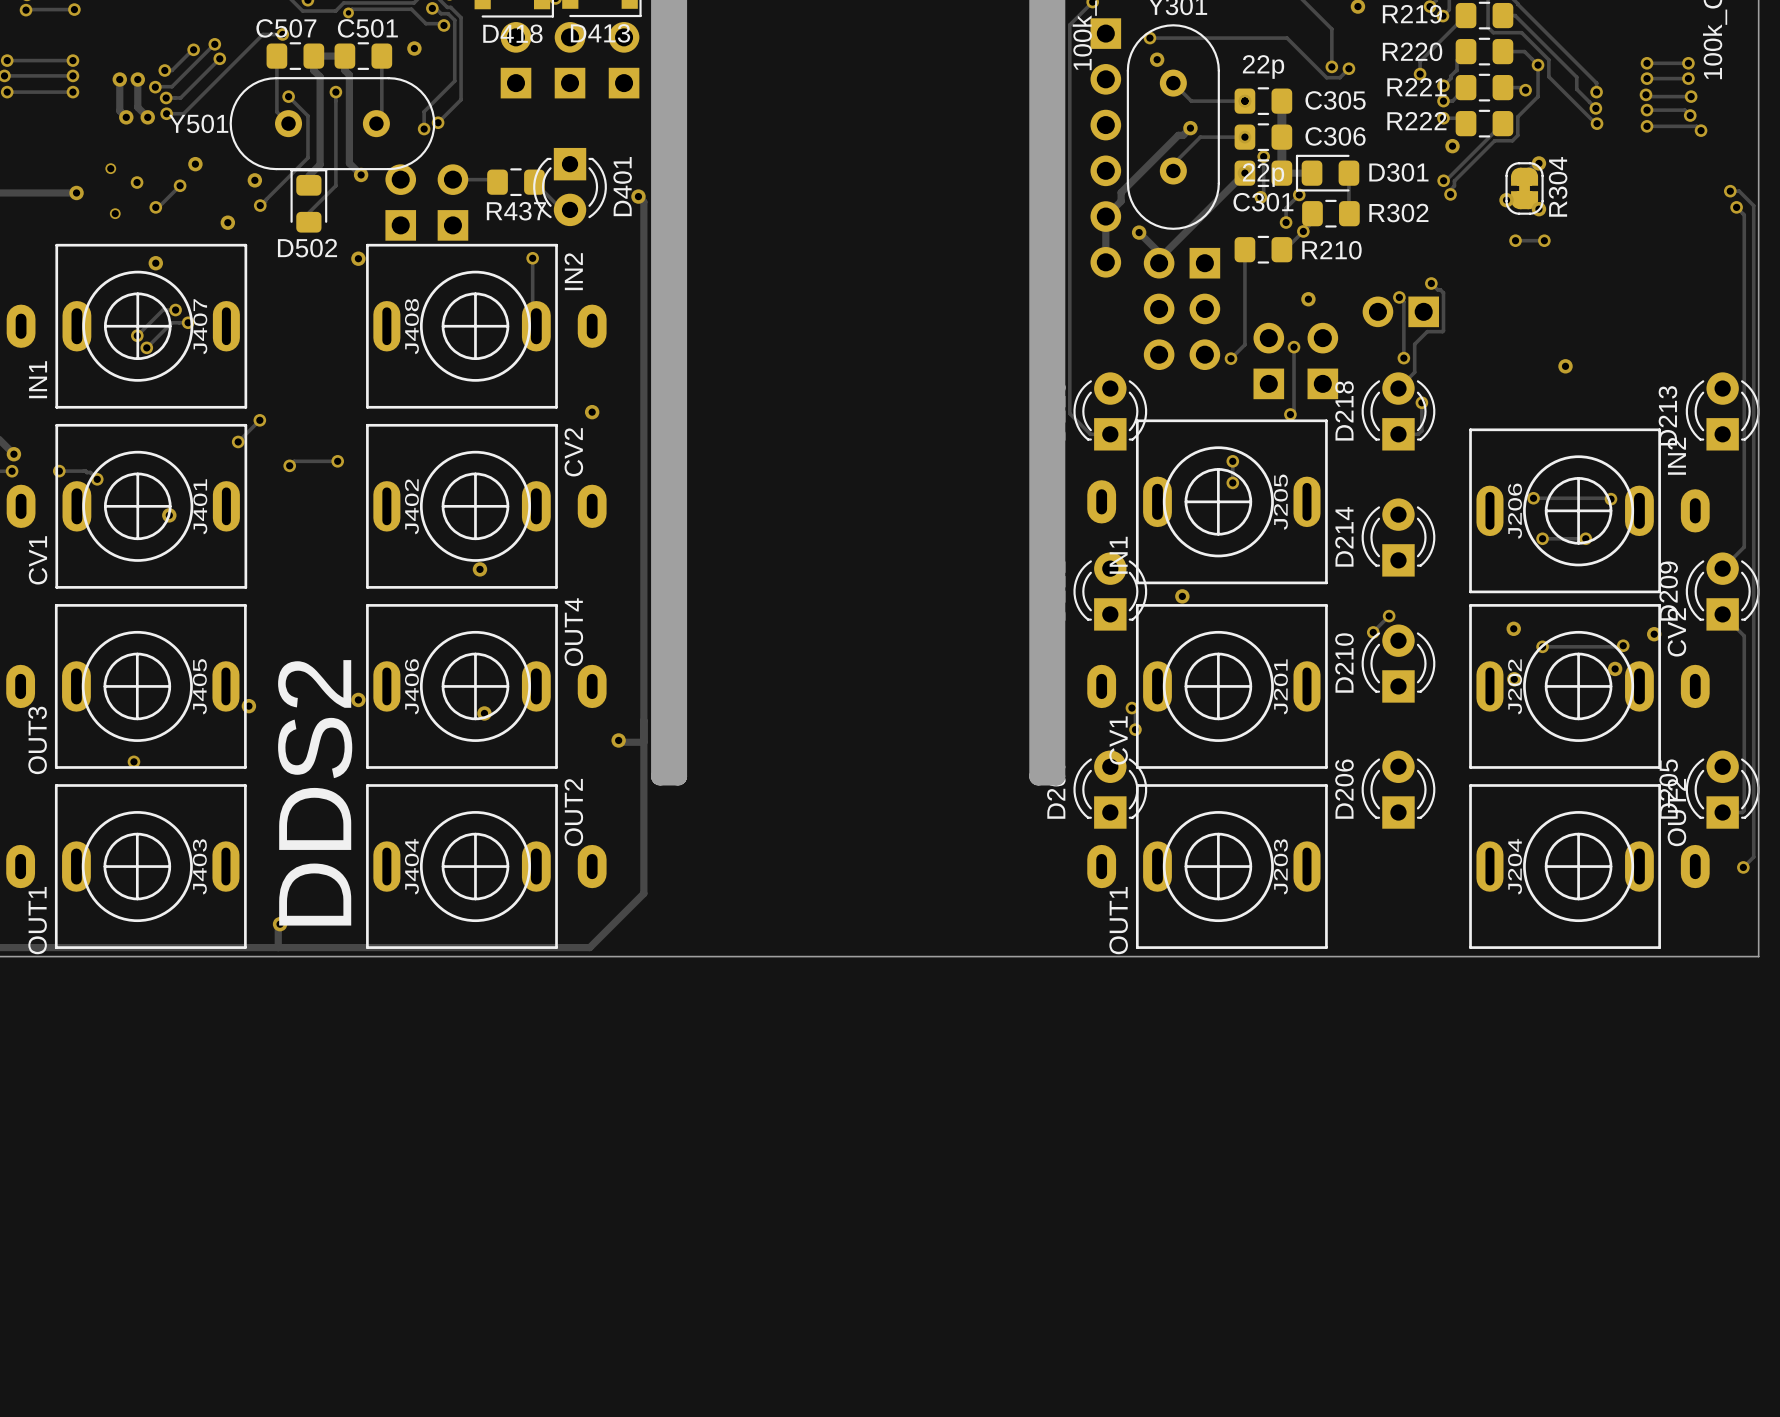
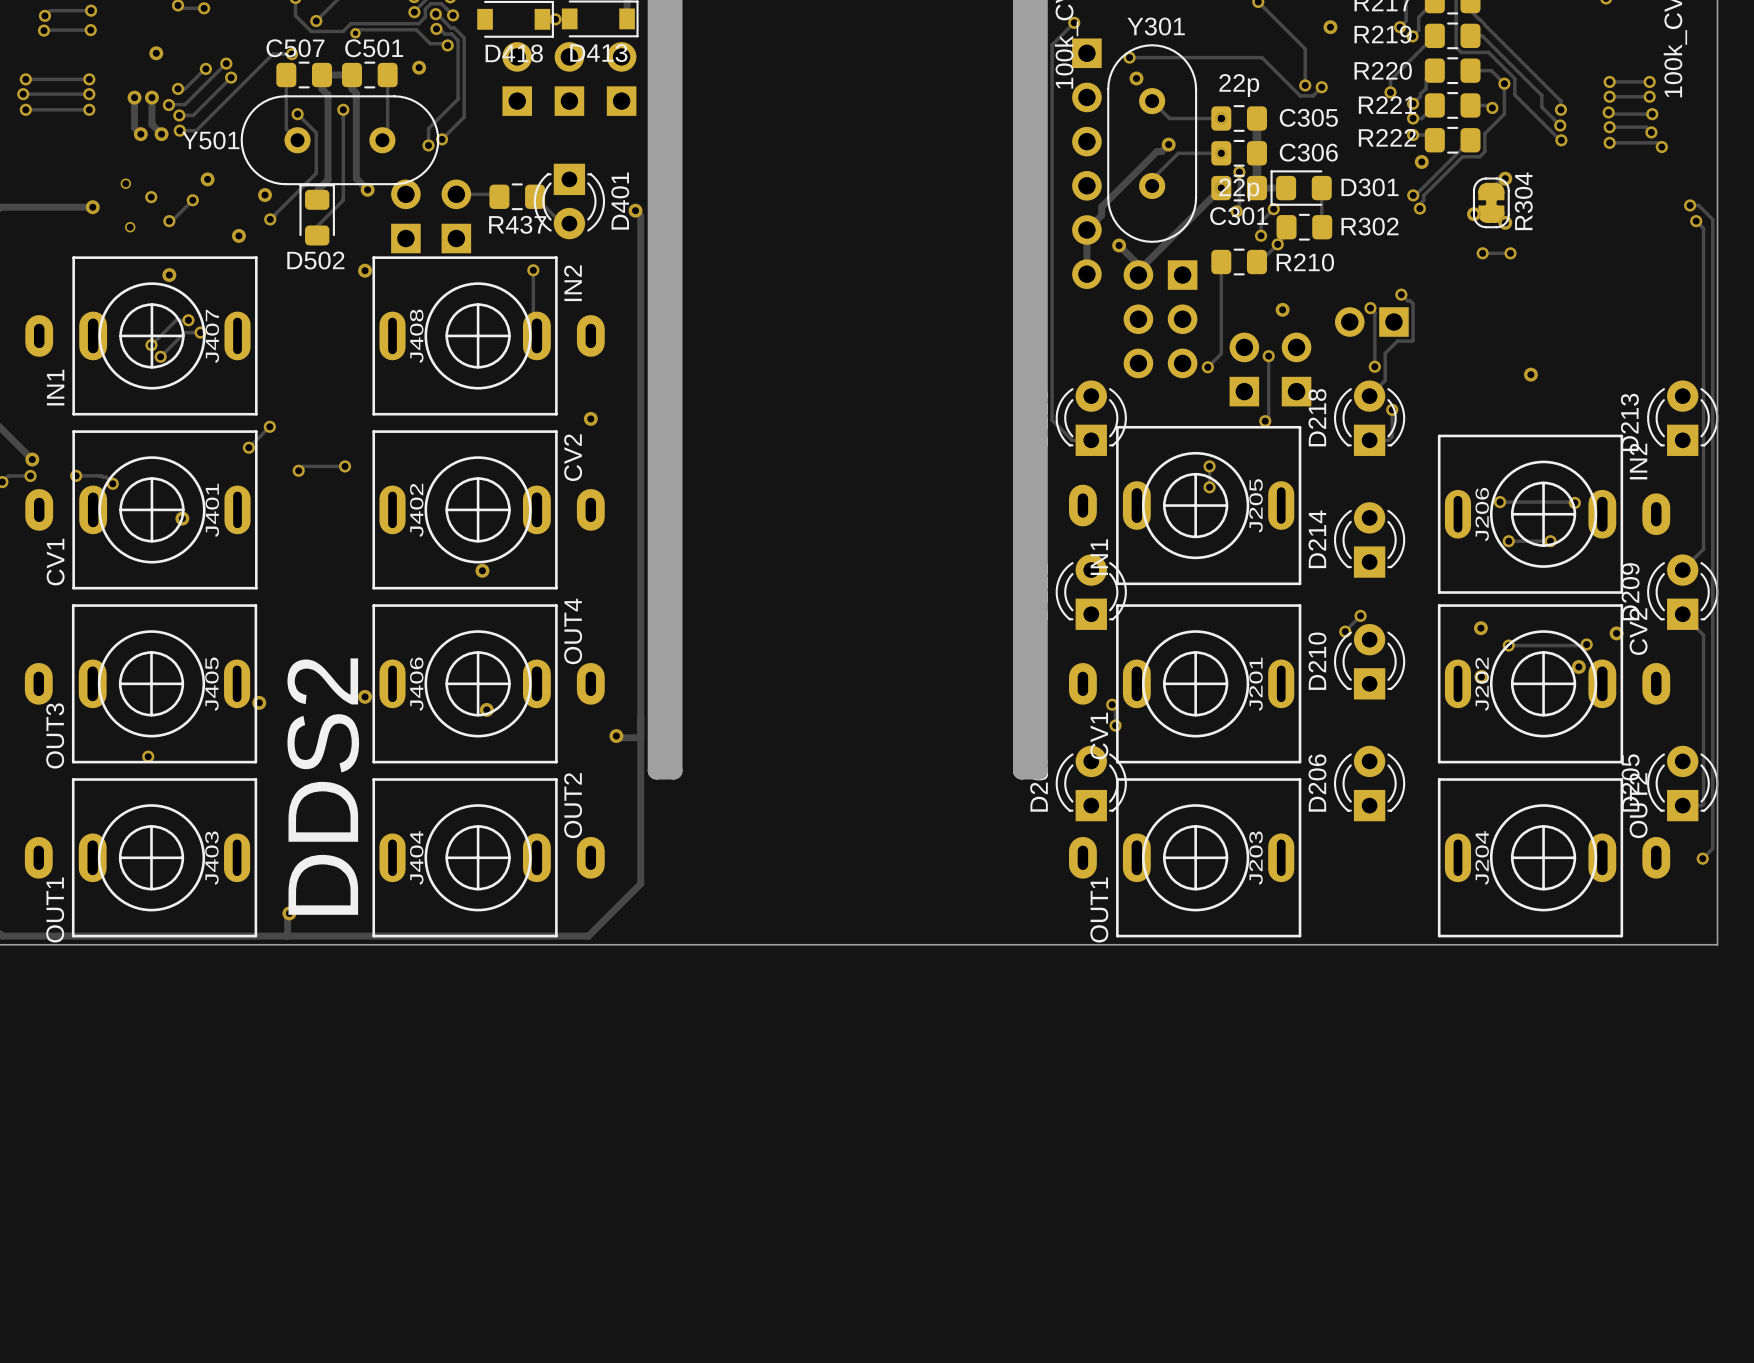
via: none -> (156, 53)
via: (1182, 596) -> none

